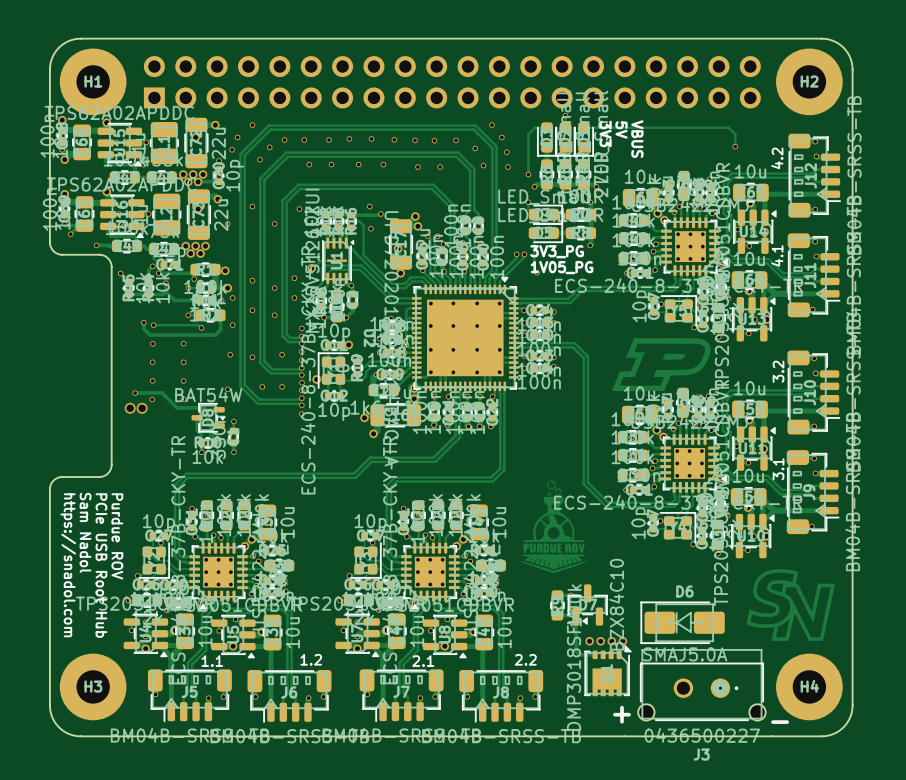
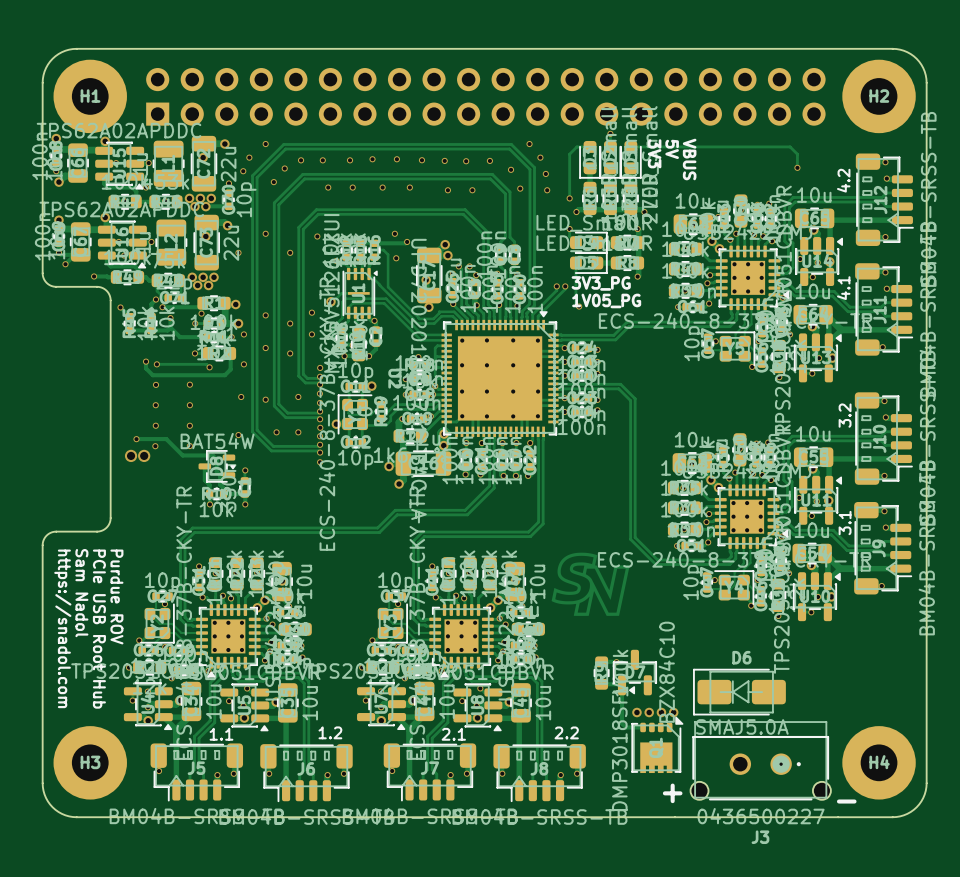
drawing: [611, 338, 711, 392] -> none
drawing shape: [520, 480, 588, 574] -> [551, 552, 630, 616]
drawing: [746, 569, 836, 641] -> none

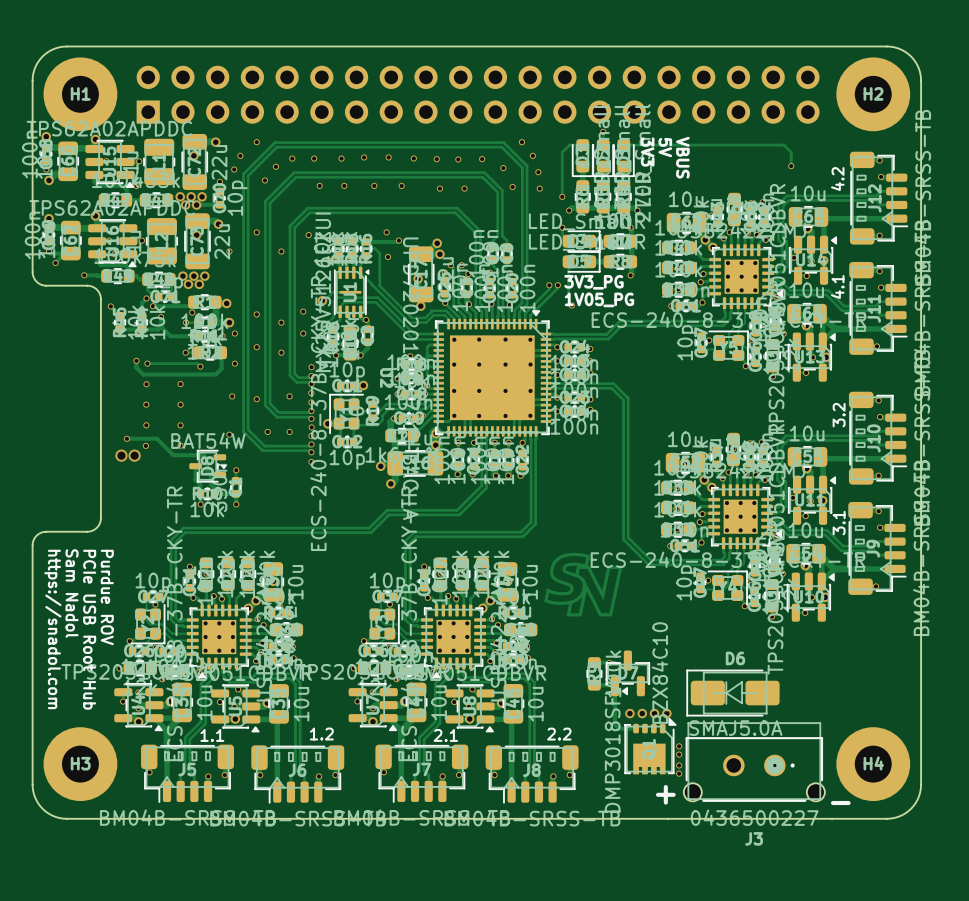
via: none -> (679, 746)
via: none -> (679, 754)
via: none -> (679, 765)
via: none -> (679, 773)

